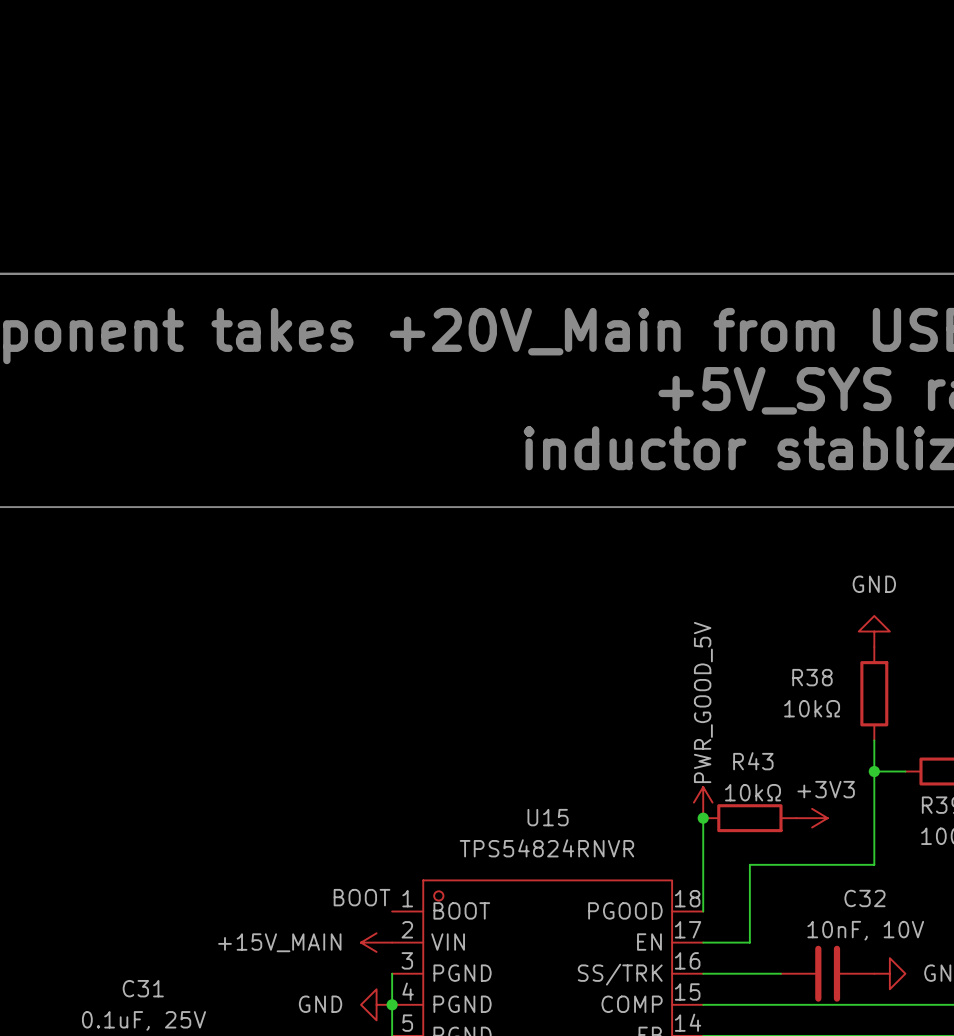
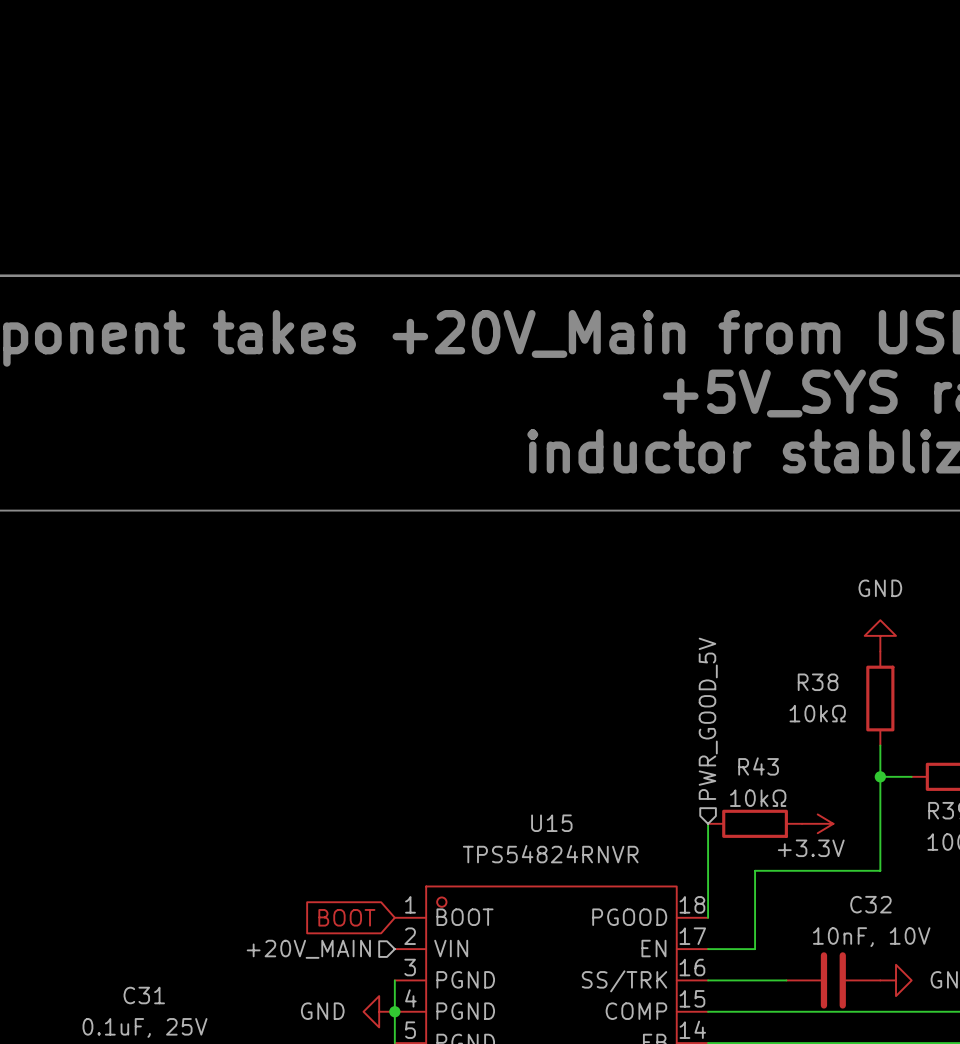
hierarchical label: none -> PWR_GOOD_5V (708, 718)
power symbol: PWR_GOOD_5V (703, 802) -> none
junction: (703, 818) -> none
power symbol: +3V3 (812, 818) -> +3.3V (817, 823)
label: BOOT (362, 897) -> none
global label: none -> BOOT (346, 917)
hierarchical label: none -> +20V_MAIN (308, 949)
power symbol: +15V_MAIN (376, 942) -> none

